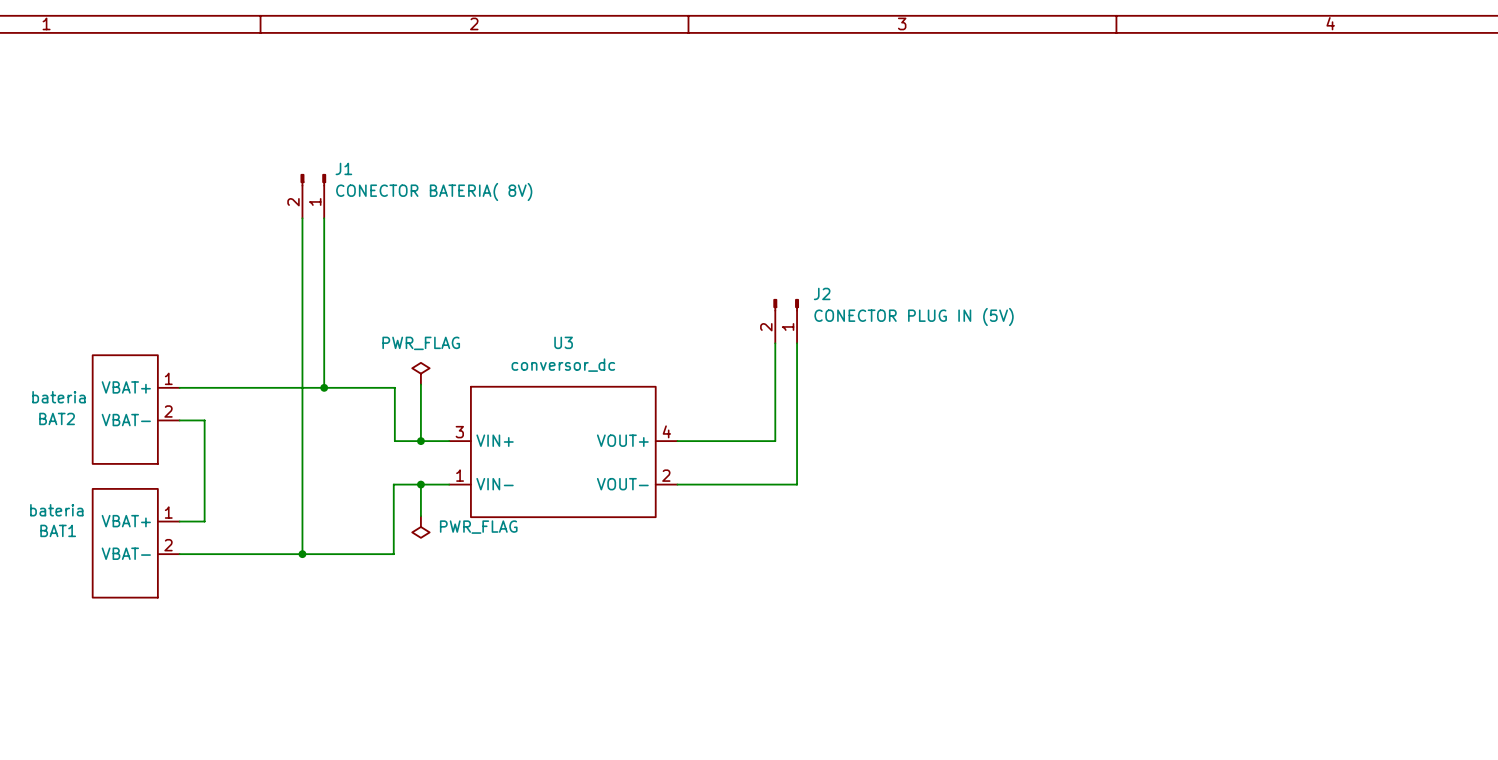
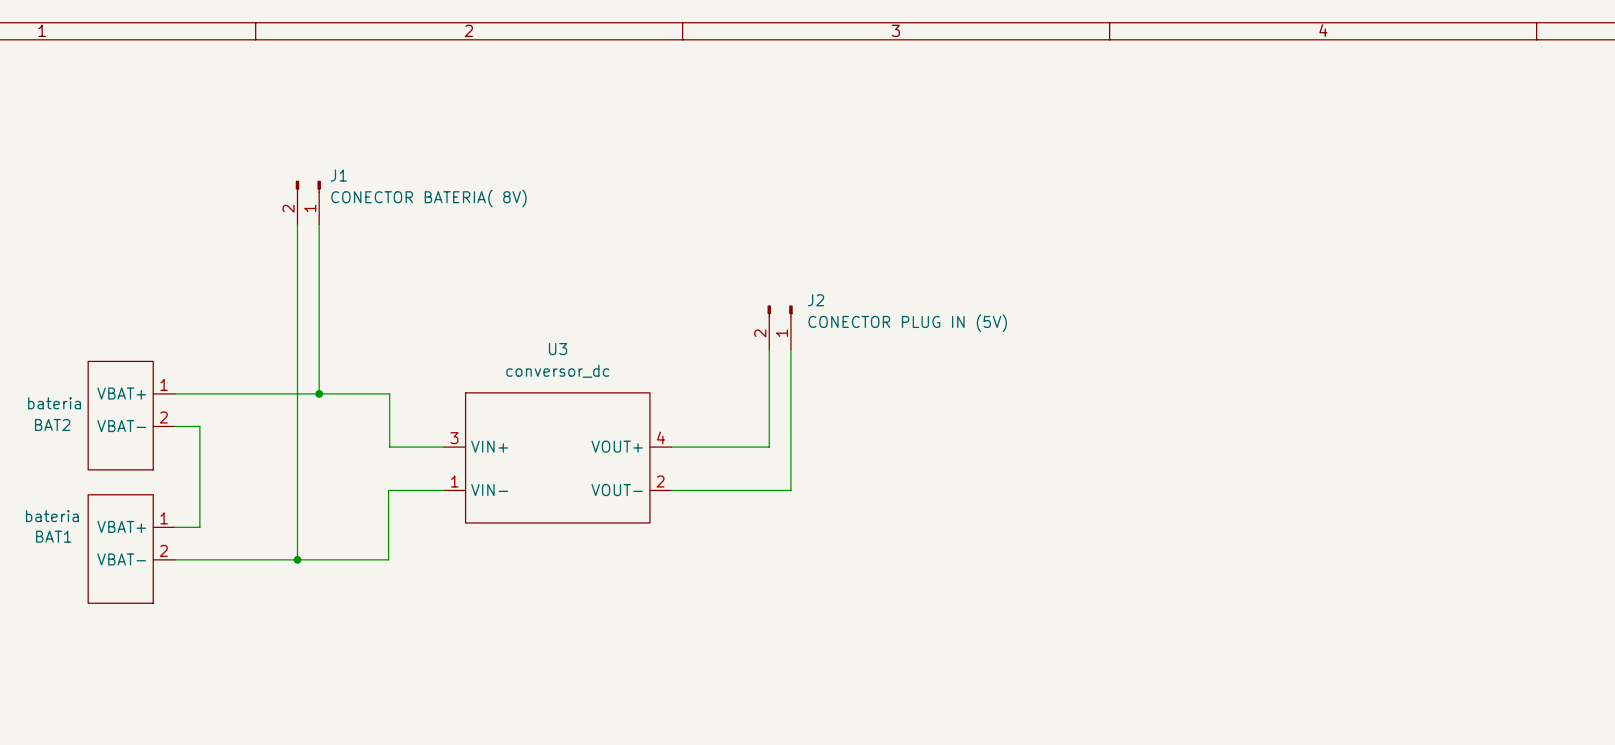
power symbol: PWR_FLAG (420, 373) -> none
wire: (420, 384) (420, 441) -> none
junction: (420, 441) -> none
wire: (420, 484) (420, 516) -> none
junction: (420, 484) -> none
power symbol: PWR_FLAG (420, 526) -> none

